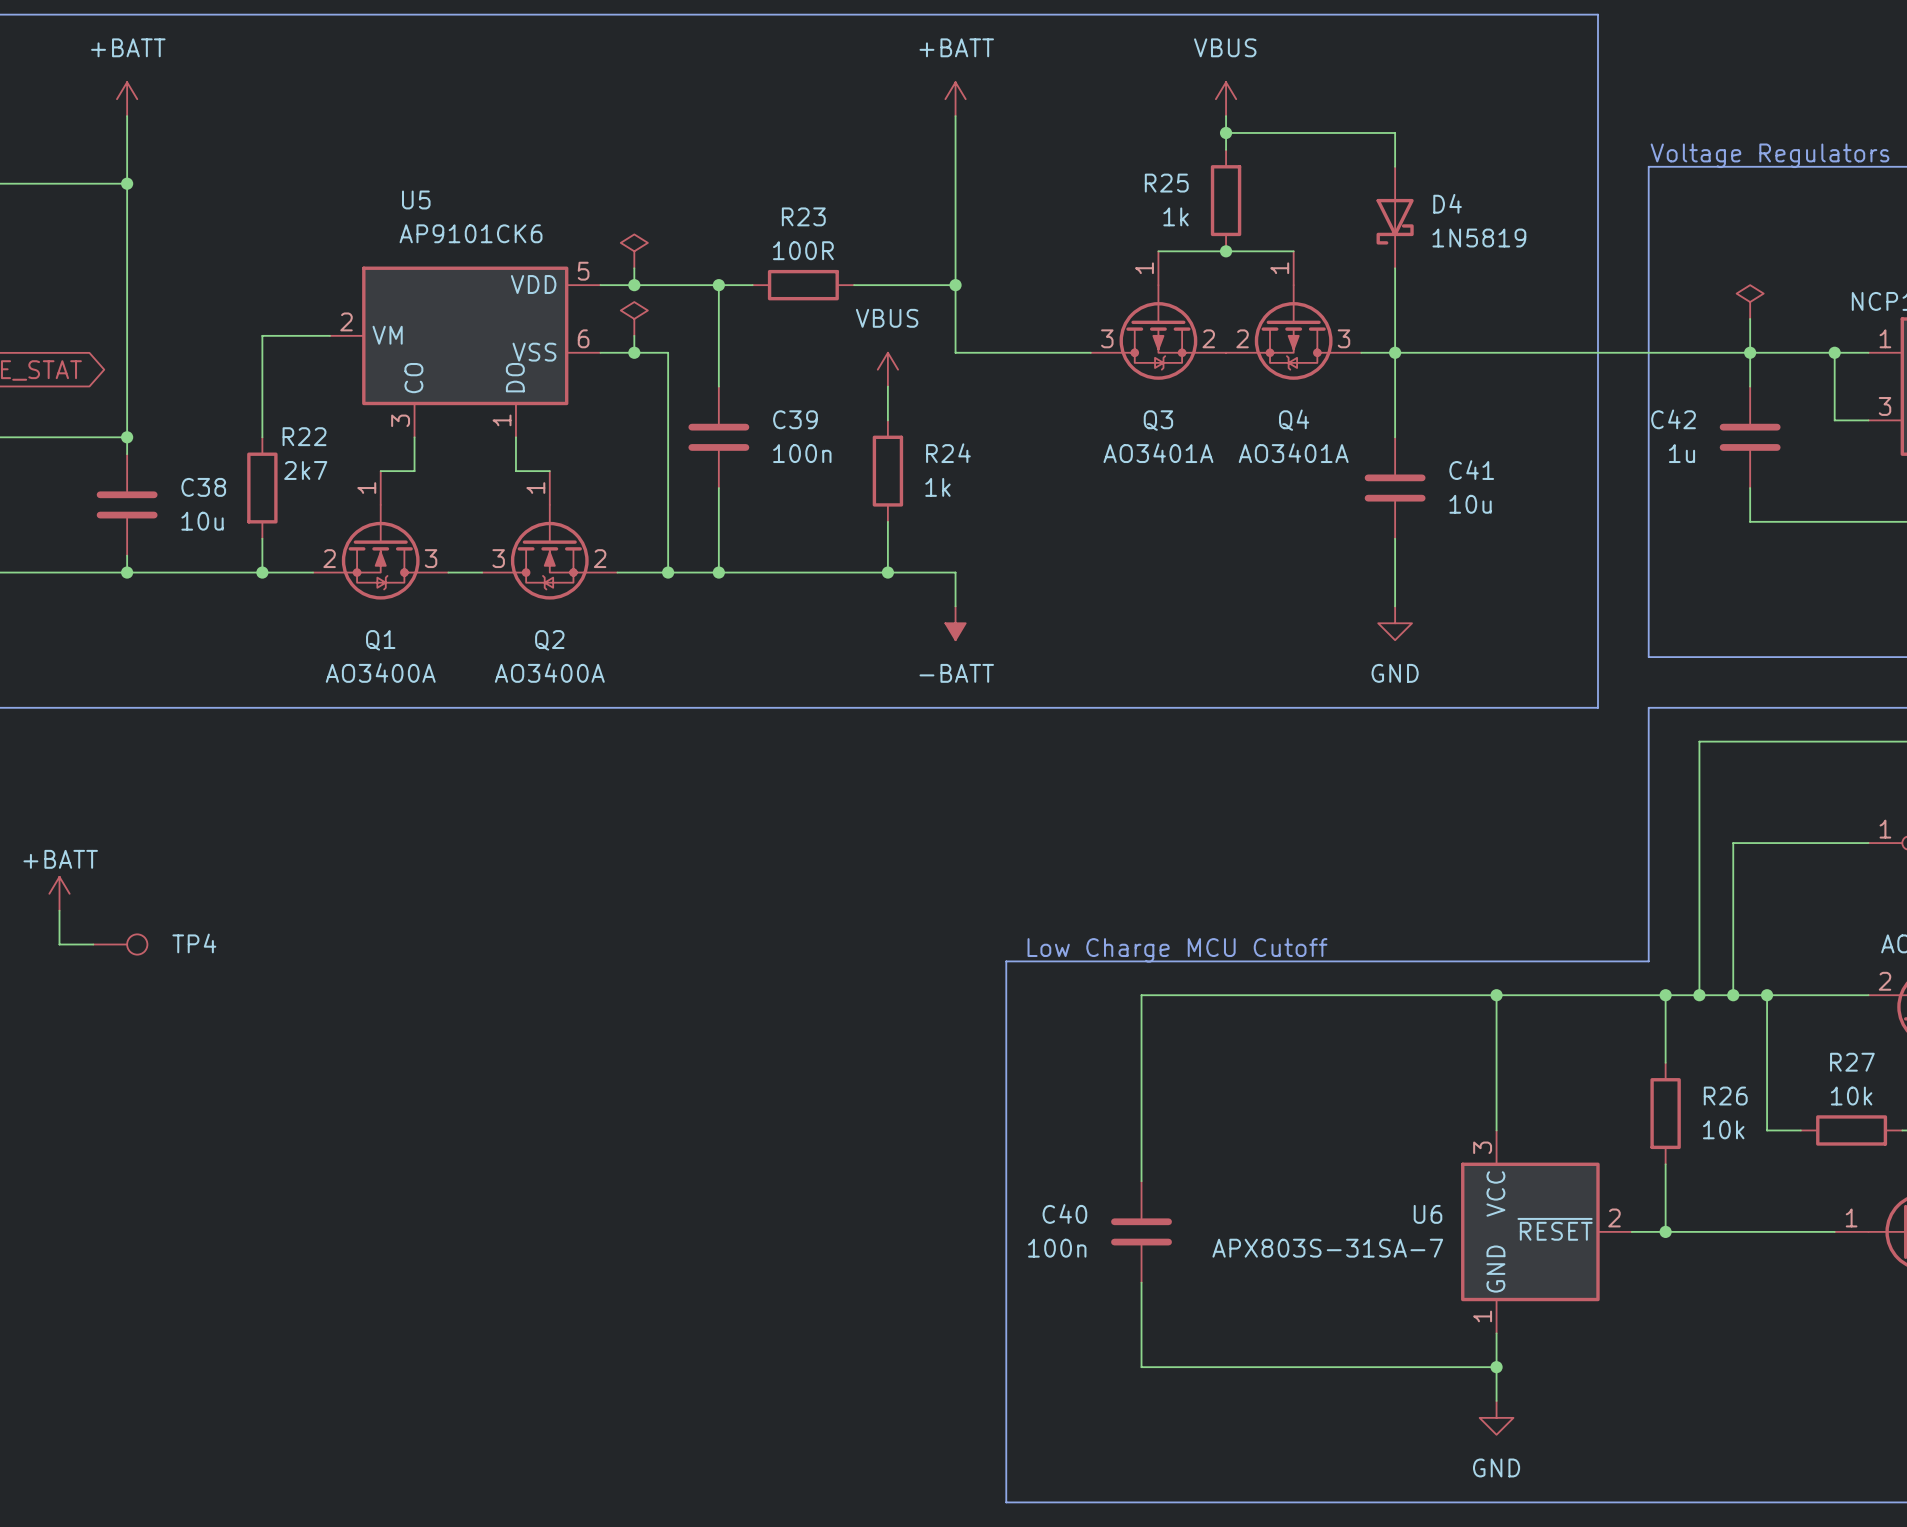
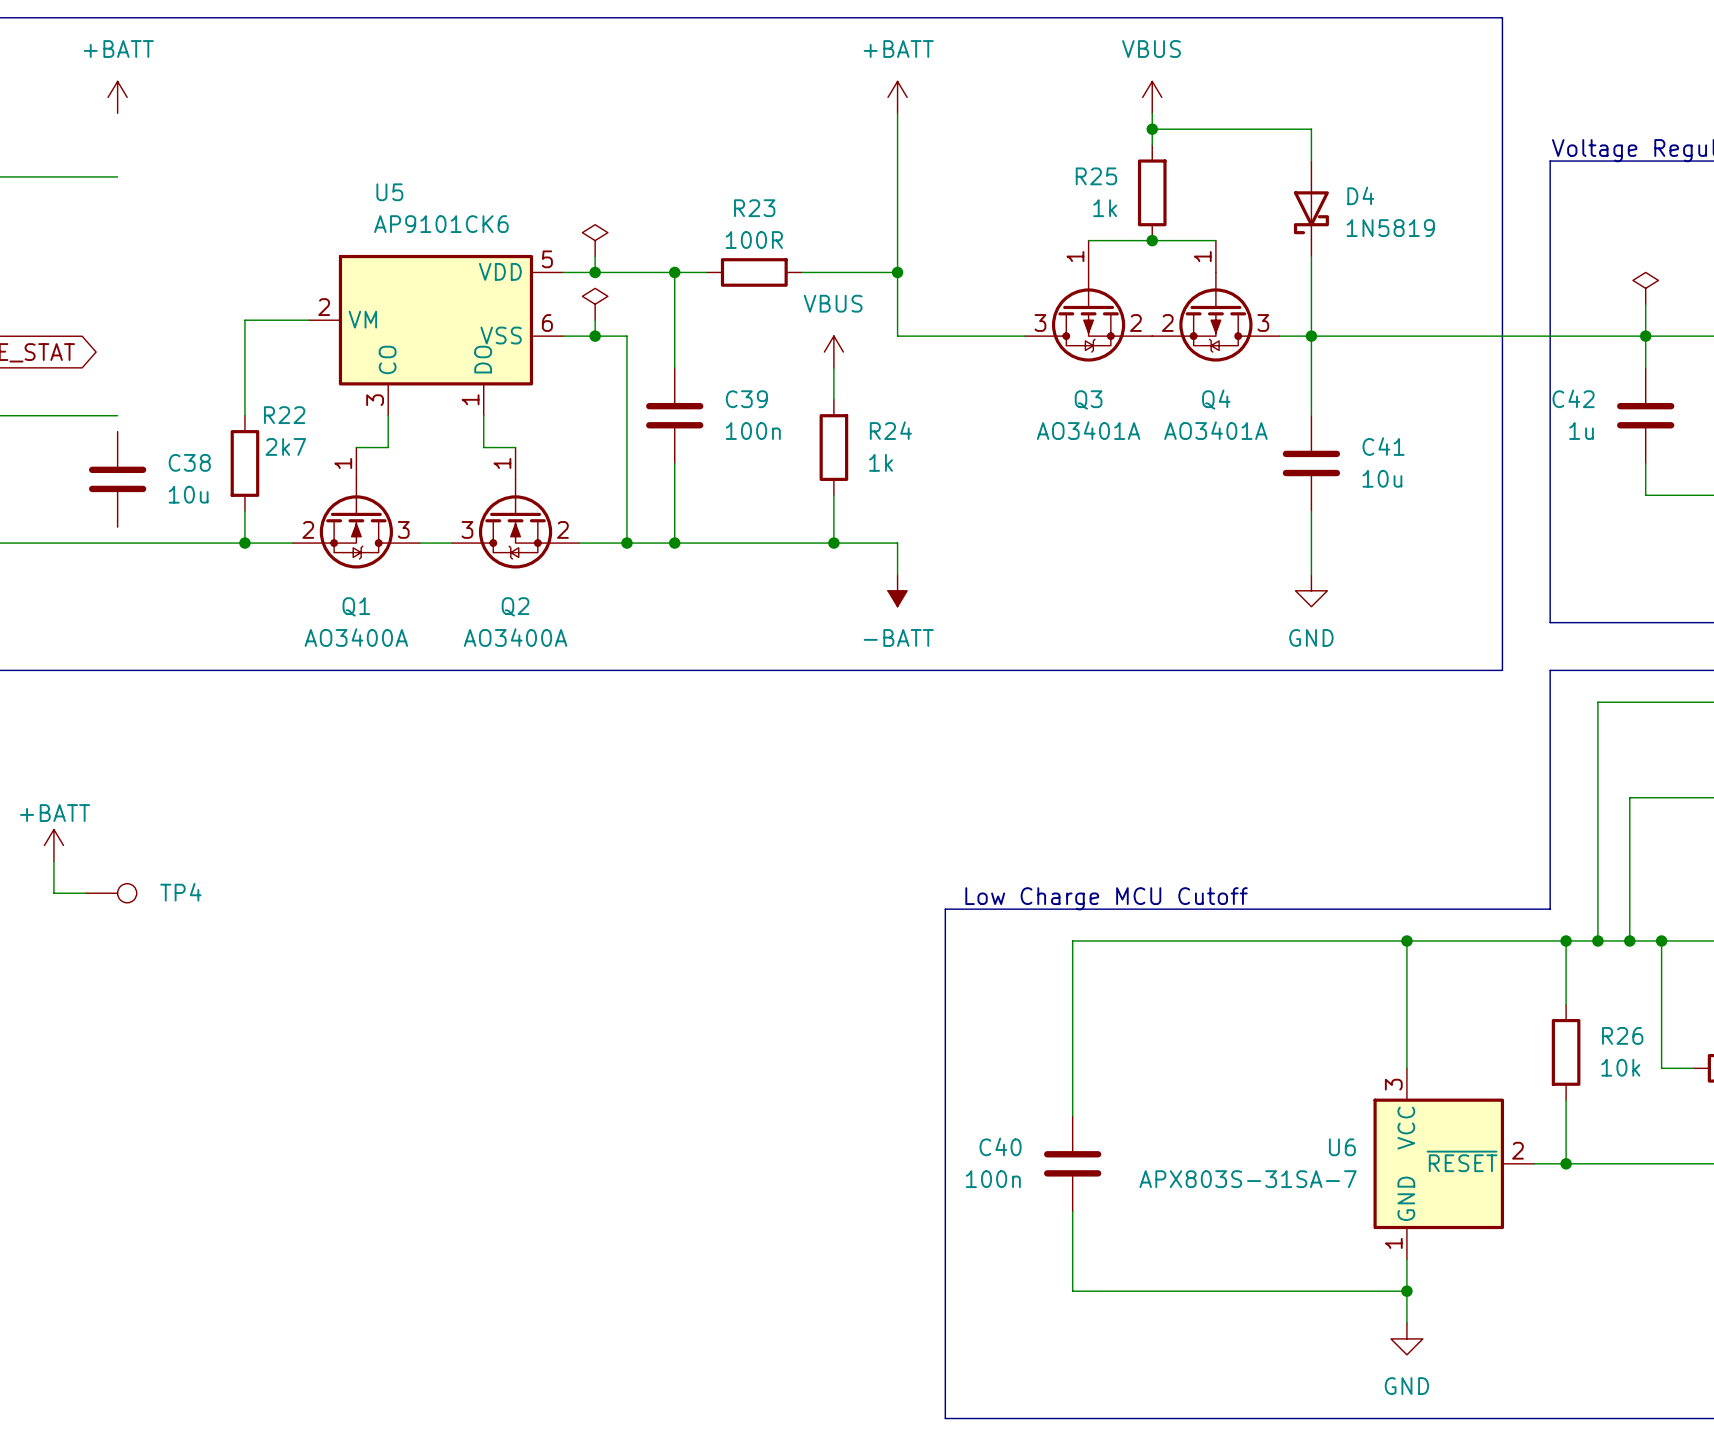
wire: (127, 116) (127, 454) -> none
junction: (127, 183) -> none
junction: (127, 437) -> none
wire: (127, 555) (127, 572) -> none
junction: (127, 572) -> none

